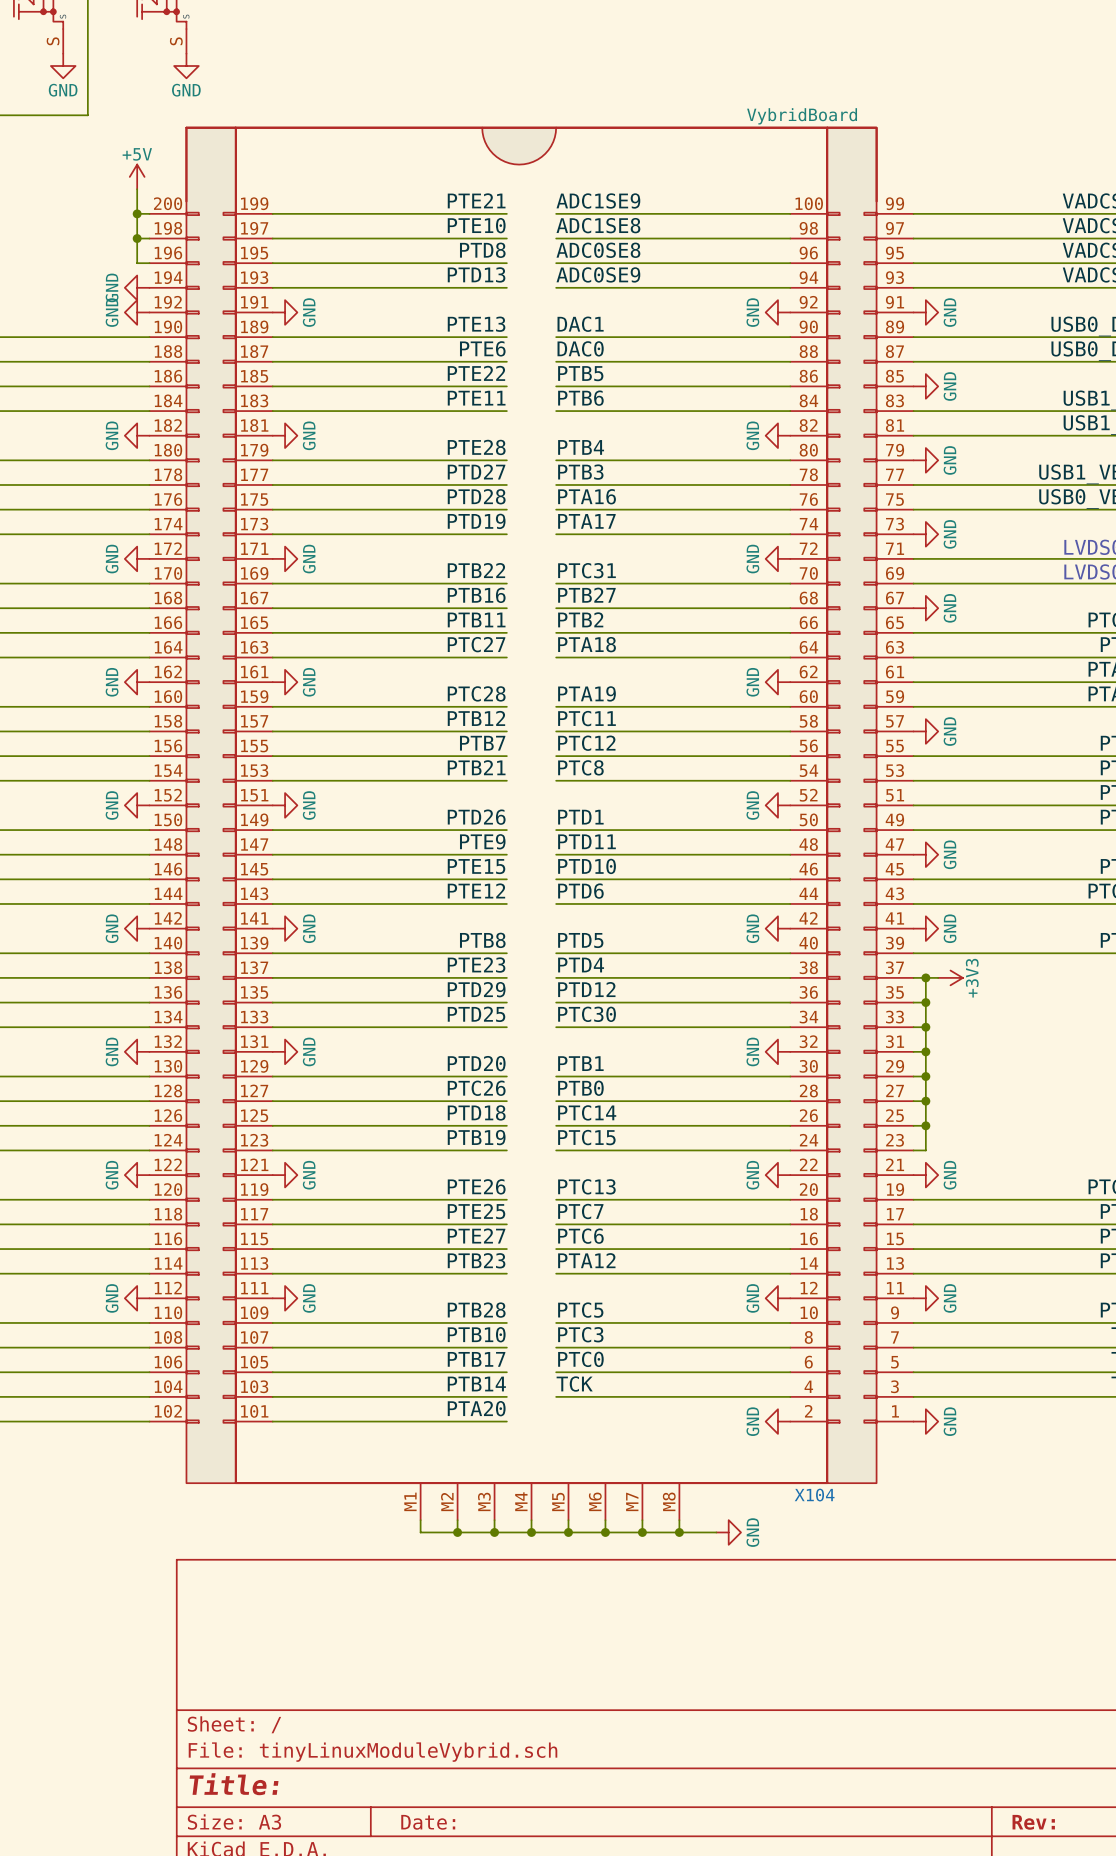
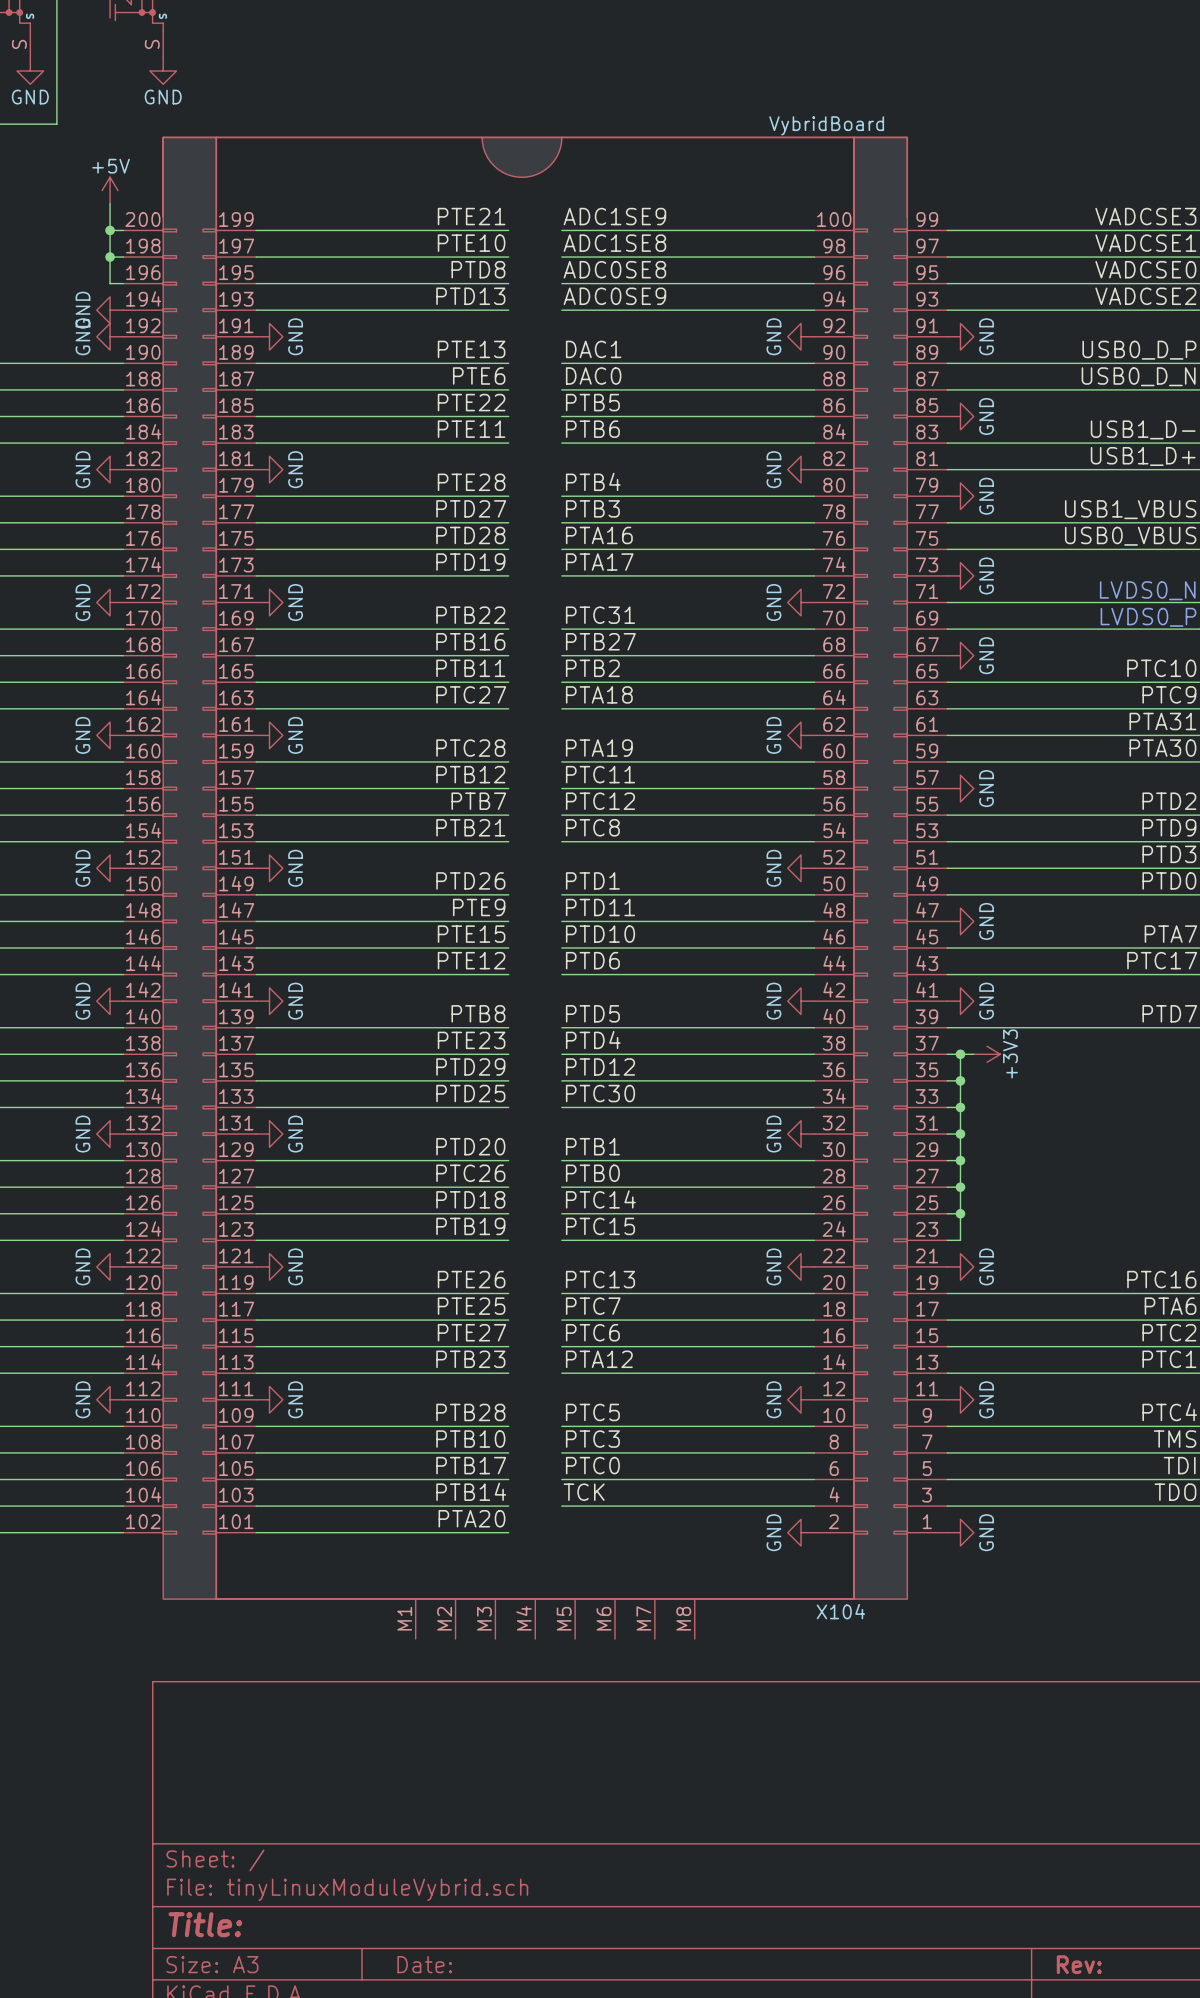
wire: (420, 1520) (420, 1532) (716, 1532) -> none
wire: (457, 1520) (457, 1532) -> none
wire: (494, 1520) (494, 1532) -> none
wire: (531, 1520) (531, 1532) -> none
wire: (568, 1520) (568, 1532) -> none
wire: (605, 1520) (605, 1532) -> none
wire: (642, 1520) (642, 1532) -> none
wire: (679, 1520) (679, 1532) -> none
junction: (457, 1532) -> none
junction: (494, 1532) -> none
junction: (531, 1532) -> none
junction: (568, 1532) -> none
junction: (605, 1532) -> none
junction: (642, 1532) -> none
junction: (679, 1532) -> none
power symbol: GND (728, 1532) -> none

